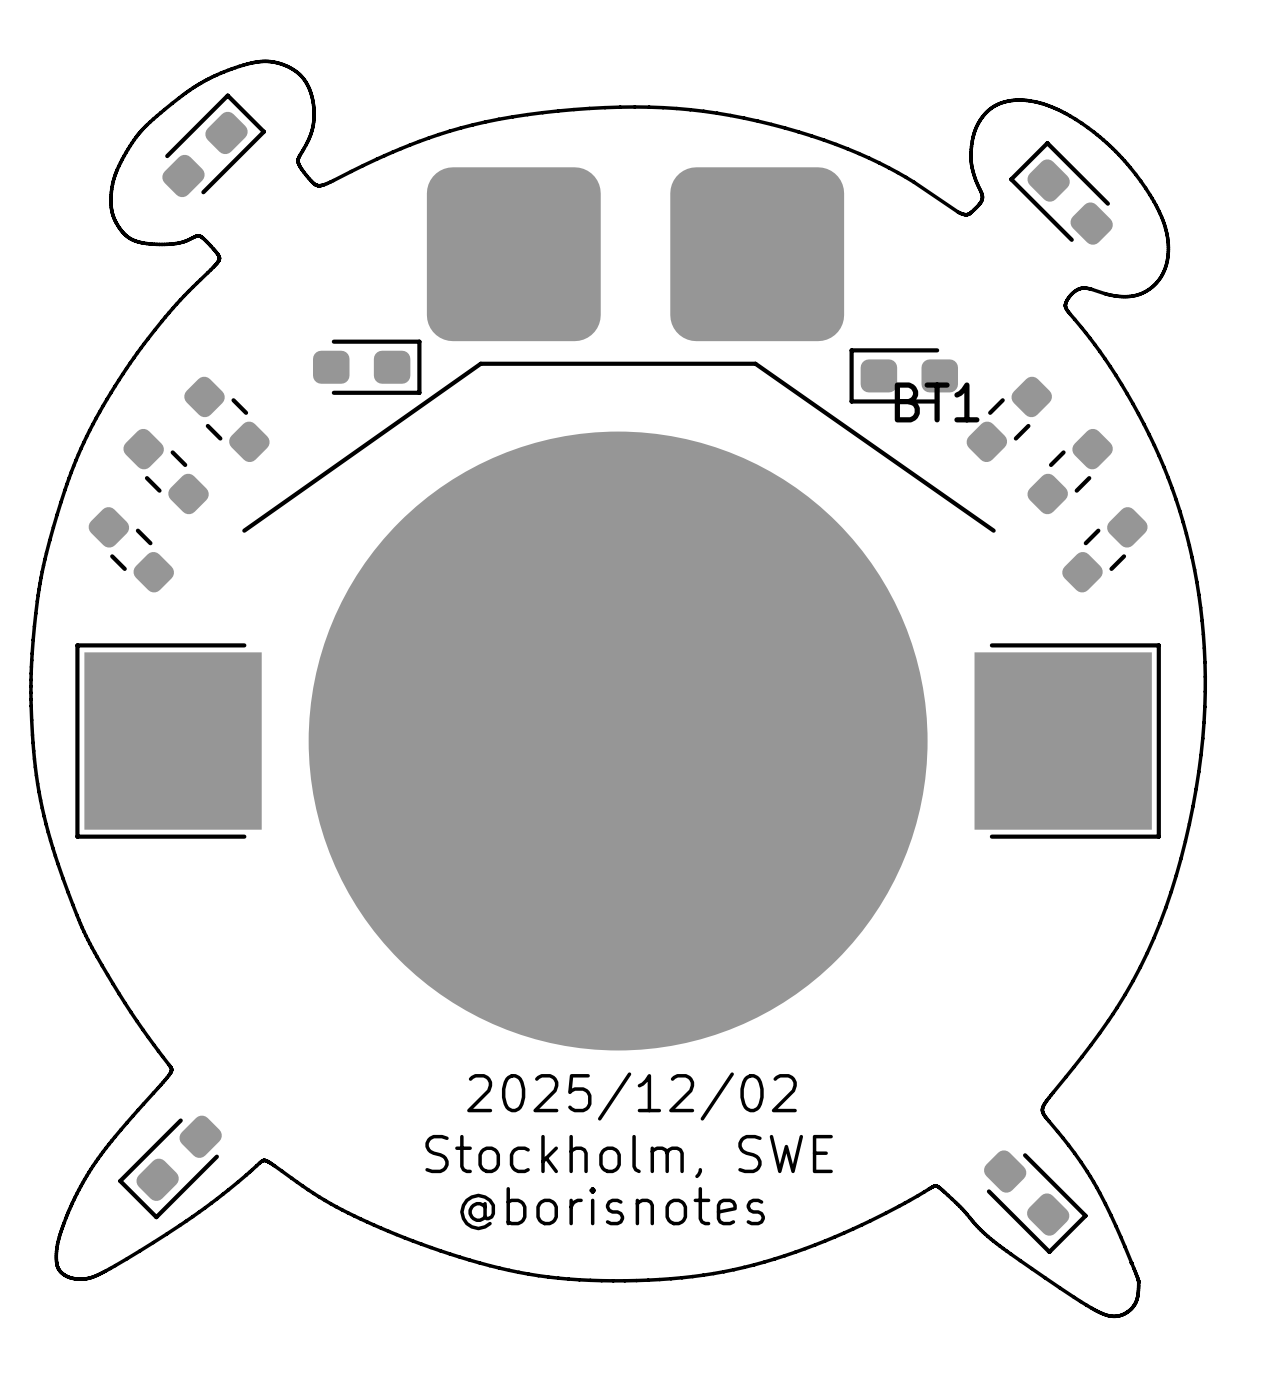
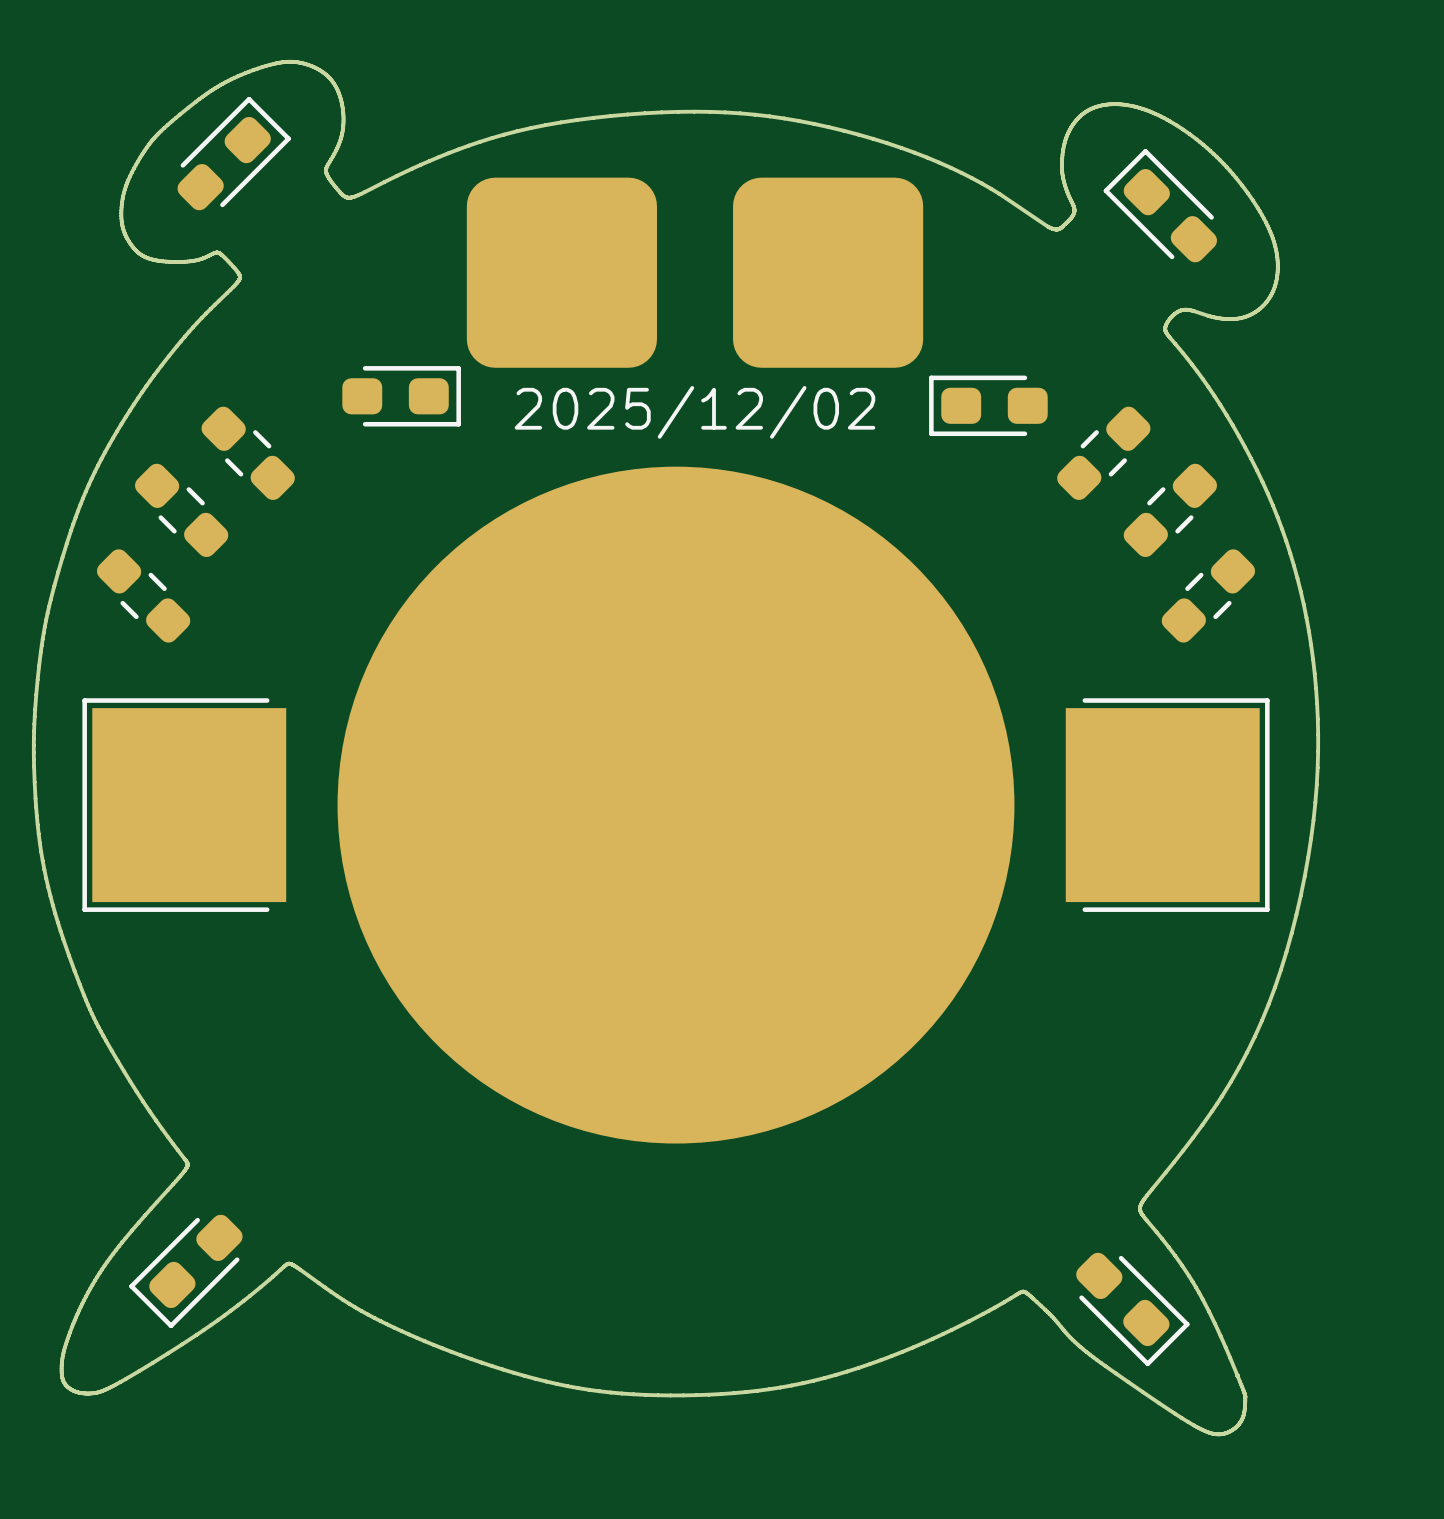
BT1: (618, 706) -> none
text position: 2025/12/02 (631, 1096) -> 2025/12/02 (694, 412)
text: Stockholm, SWE (629, 1156) -> none
text: @borisnotes (612, 1208) -> none

